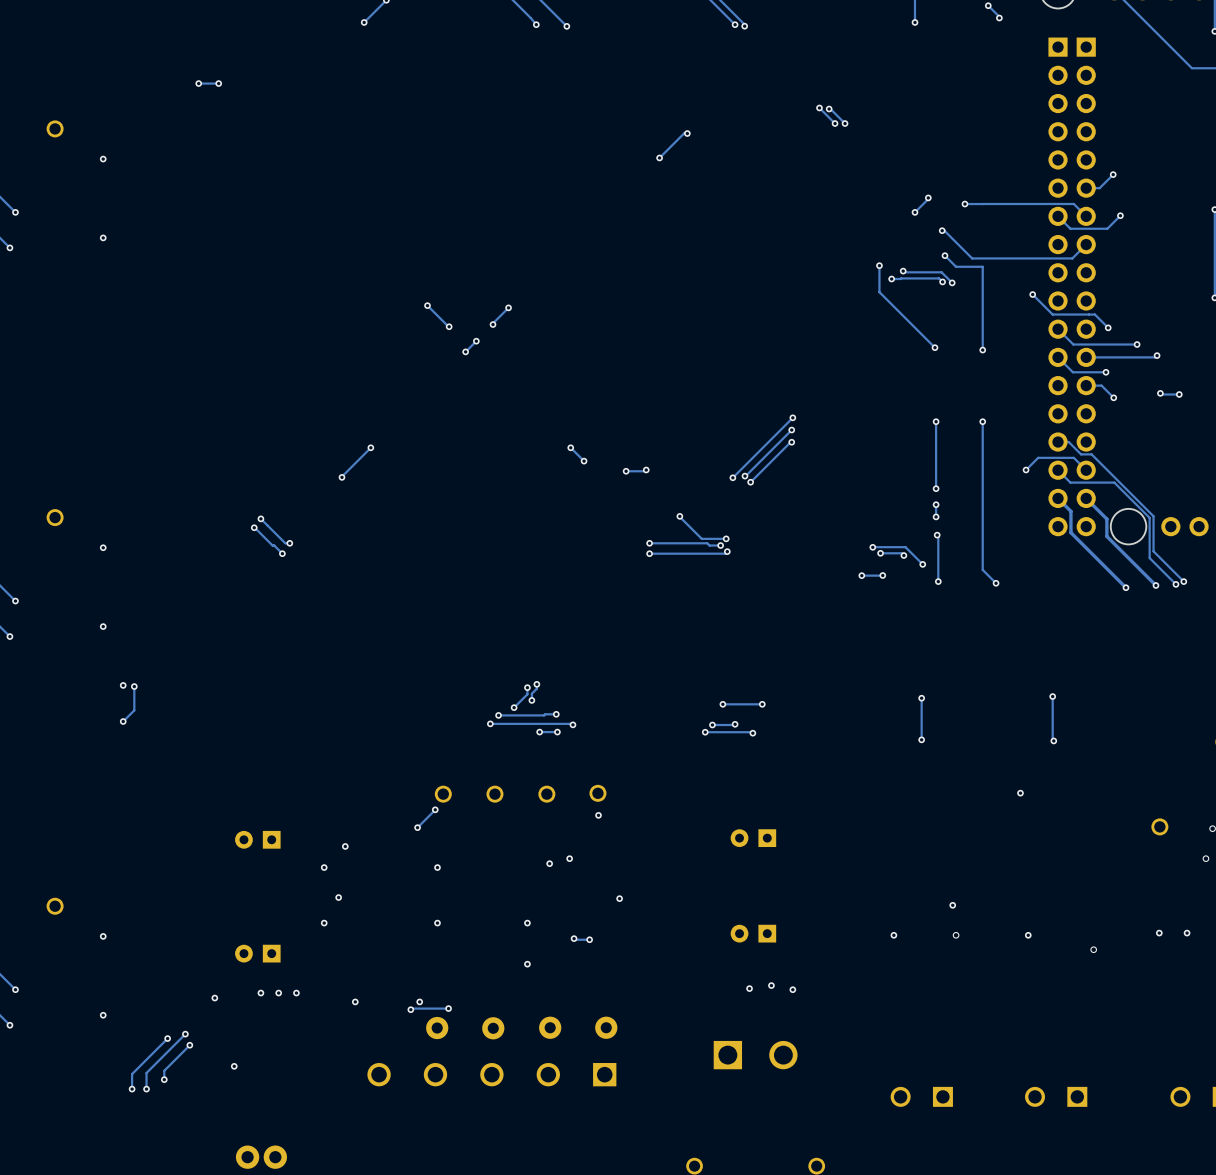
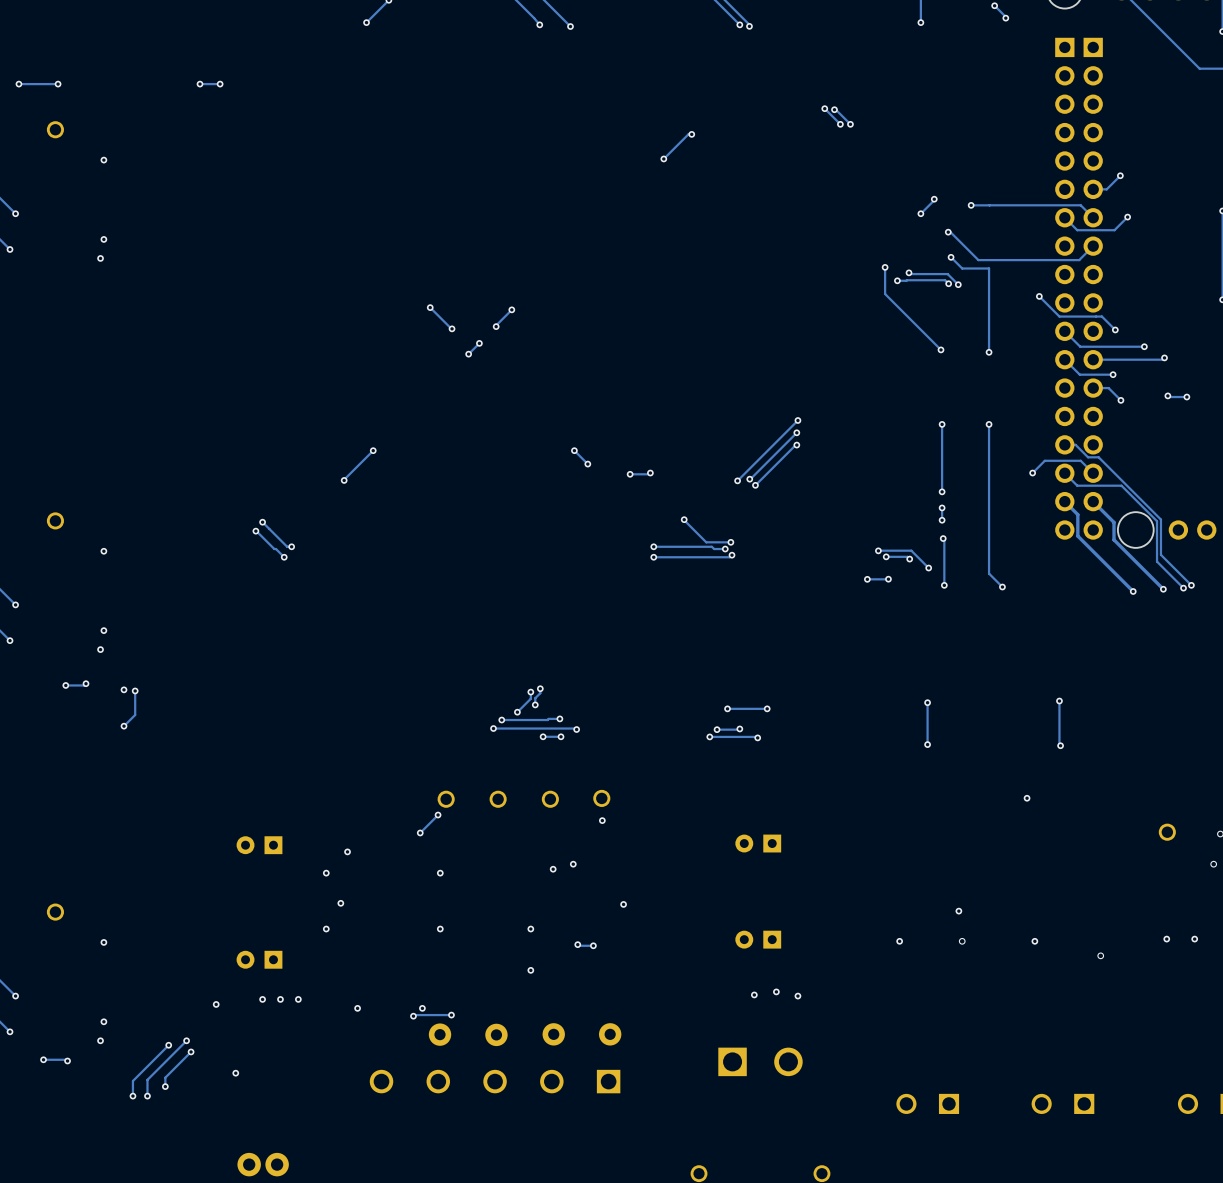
via: none -> (18, 84)
track: none -> (58, 84) (18, 84)
via: none -> (58, 84)
via: none -> (100, 258)
via: none -> (100, 649)
track: none -> (86, 683) (84, 685) (65, 685)
via: none -> (86, 683)
via: none -> (65, 685)
via: none -> (100, 1040)
track: none -> (43, 1059) (67, 1061)
via: none -> (43, 1059)
via: none -> (67, 1061)

